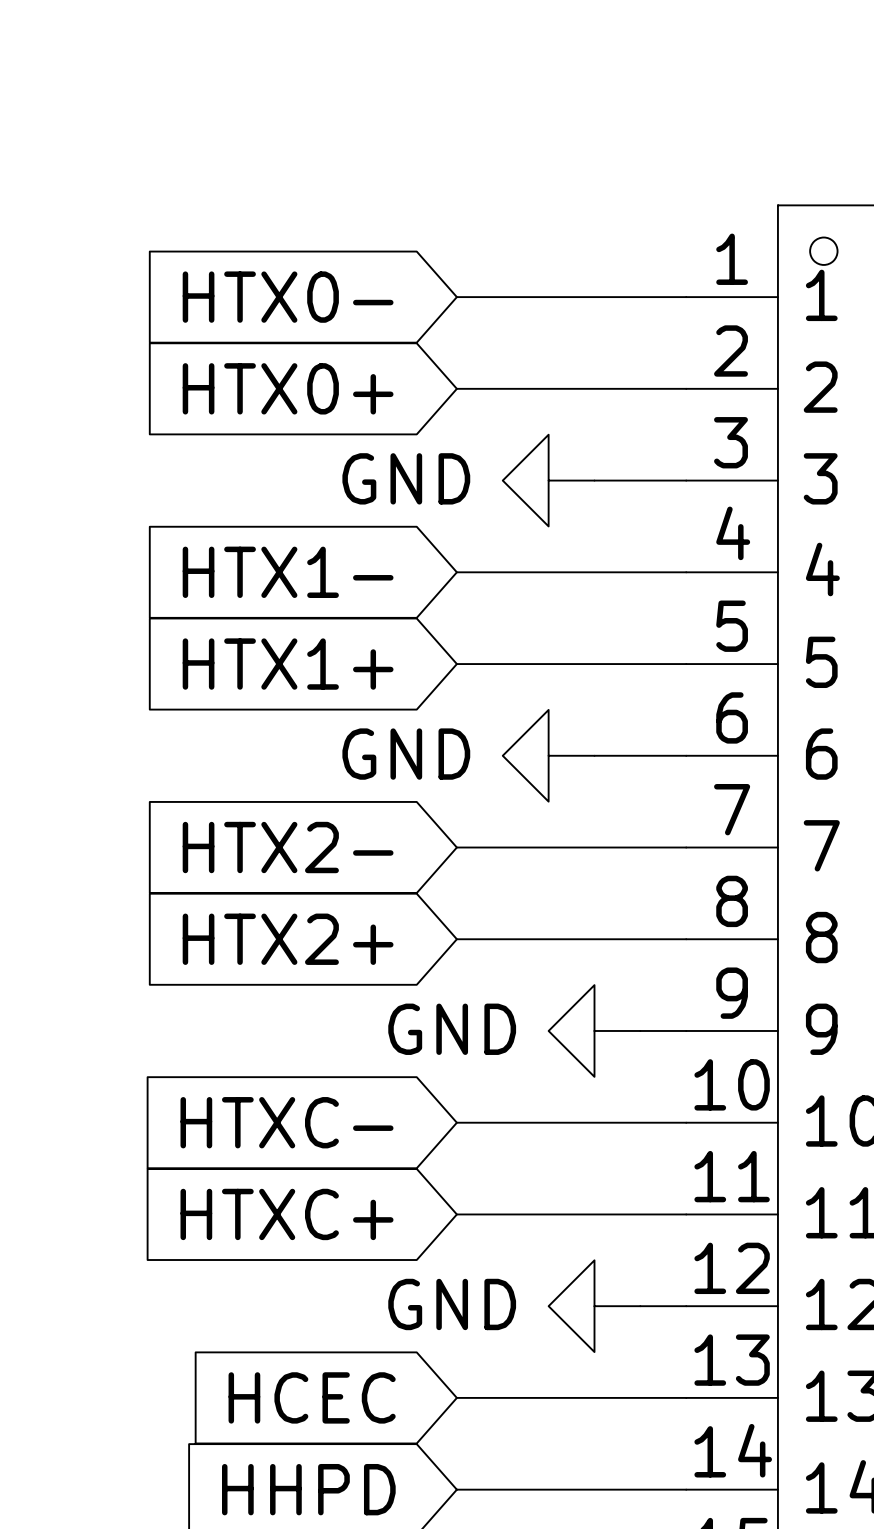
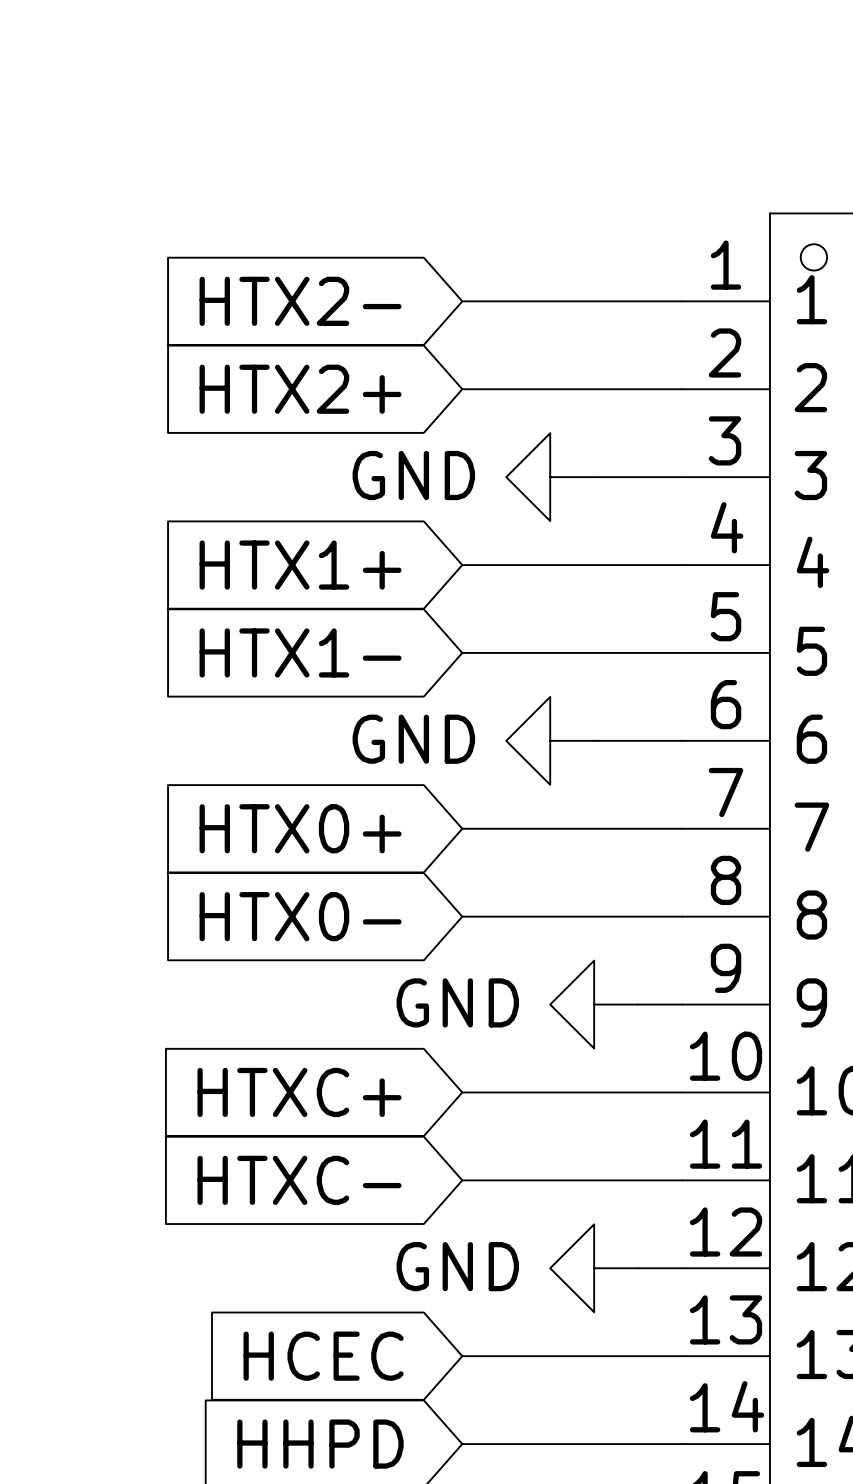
global label: HTX0- (288, 297) -> HTX2- (300, 301)
global label: HTX0+ (288, 388) -> HTX2+ (300, 389)
global label: HTX1- (288, 572) -> HTX1+ (300, 565)
global label: HTX1+ (288, 664) -> HTX1- (300, 652)
global label: HTX2- (288, 847) -> HTX0+ (300, 828)
global label: HTX2+ (288, 939) -> HTX0- (300, 916)
global label: HTXC- (287, 1122) -> HTXC+ (299, 1092)
global label: HTXC+ (287, 1214) -> HTXC- (299, 1180)

